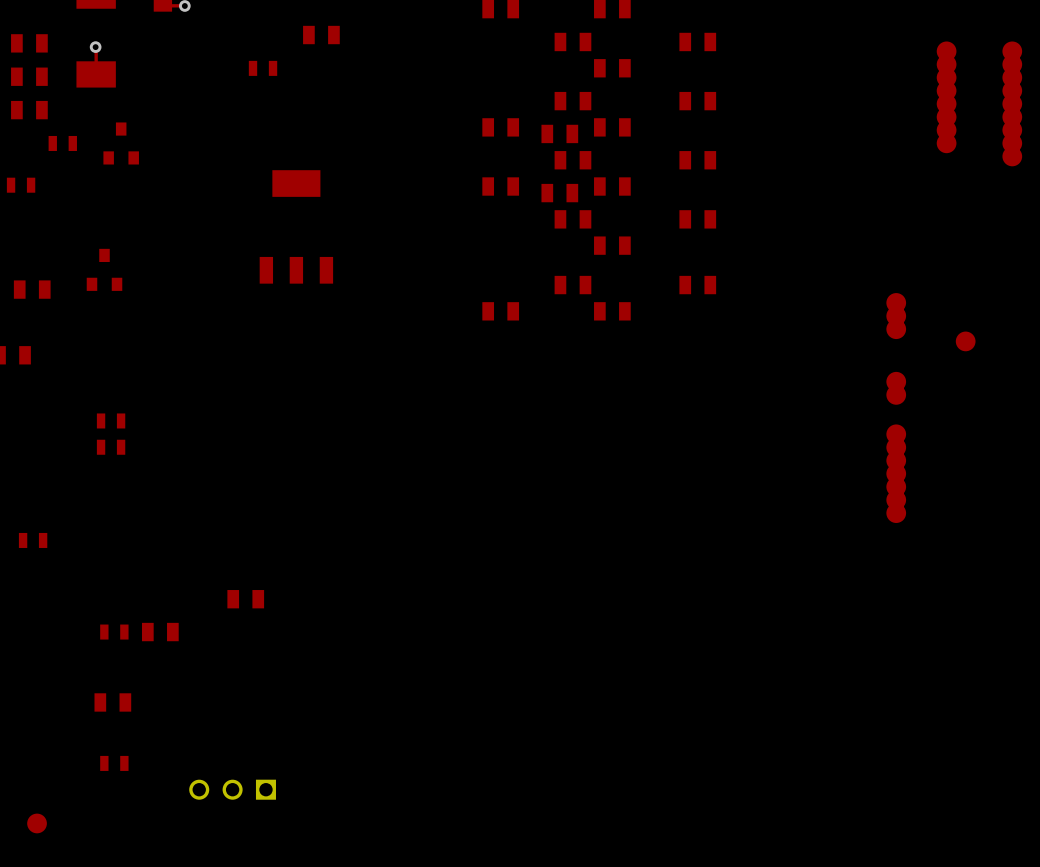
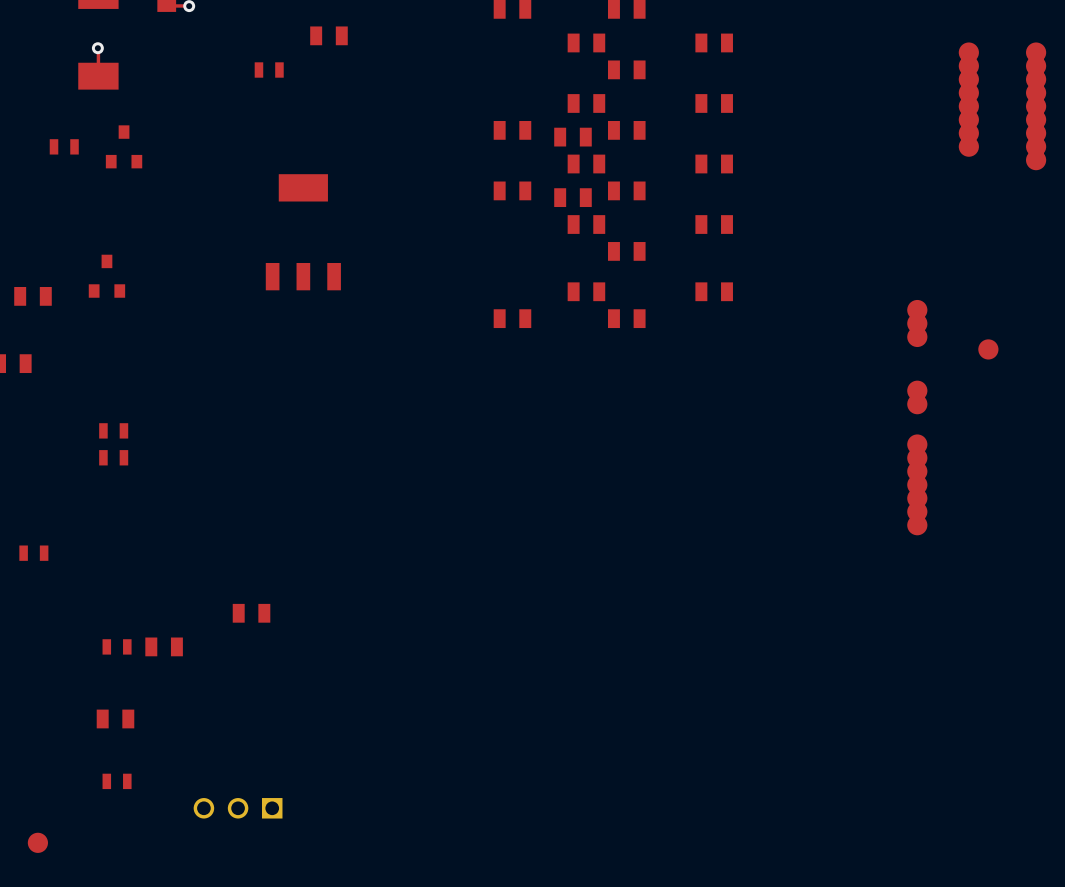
part: (29, 43) -> none
part: (29, 76) -> none
part: (29, 110) -> none
part: (21, 185) -> none

